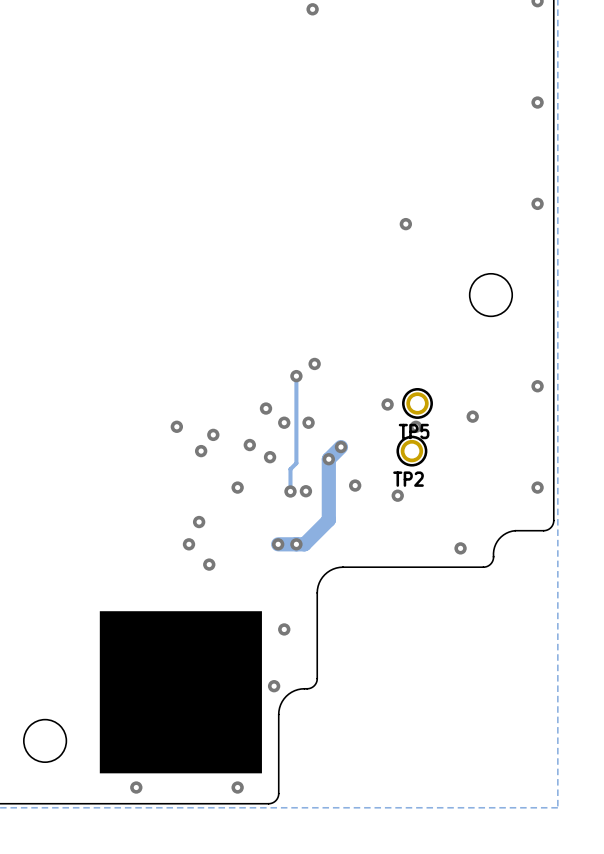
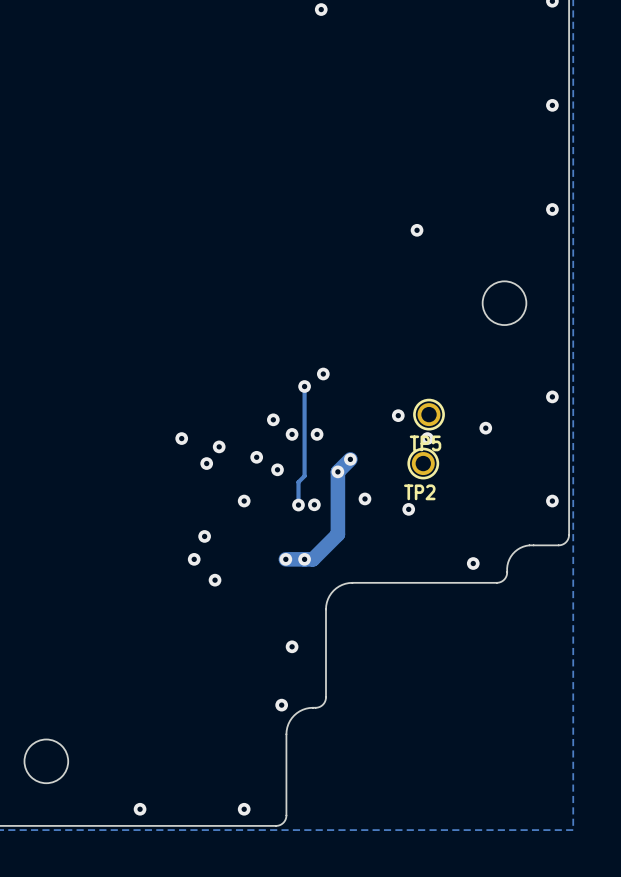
drawing: [99, 611, 262, 774] -> none

